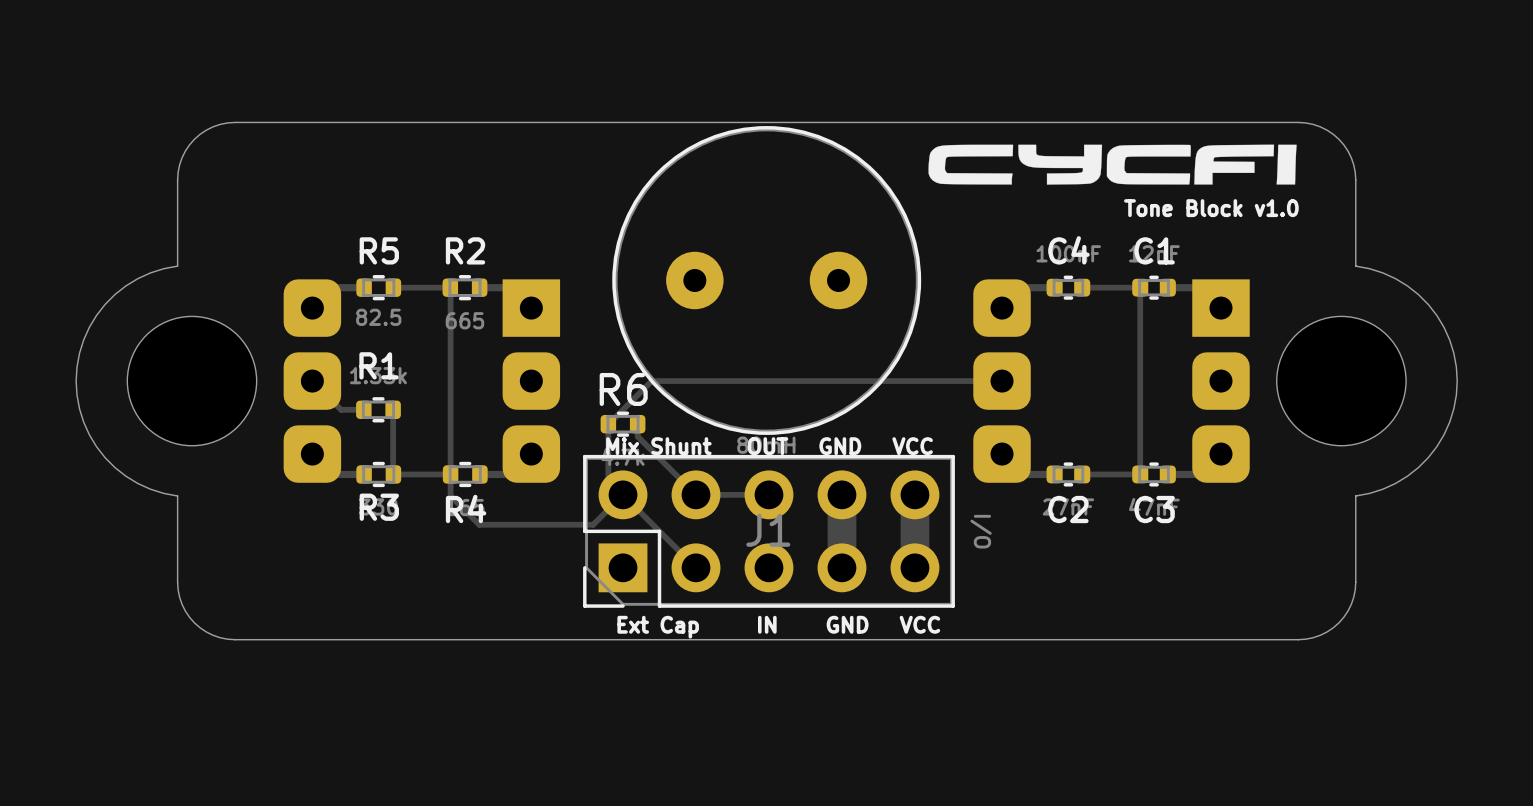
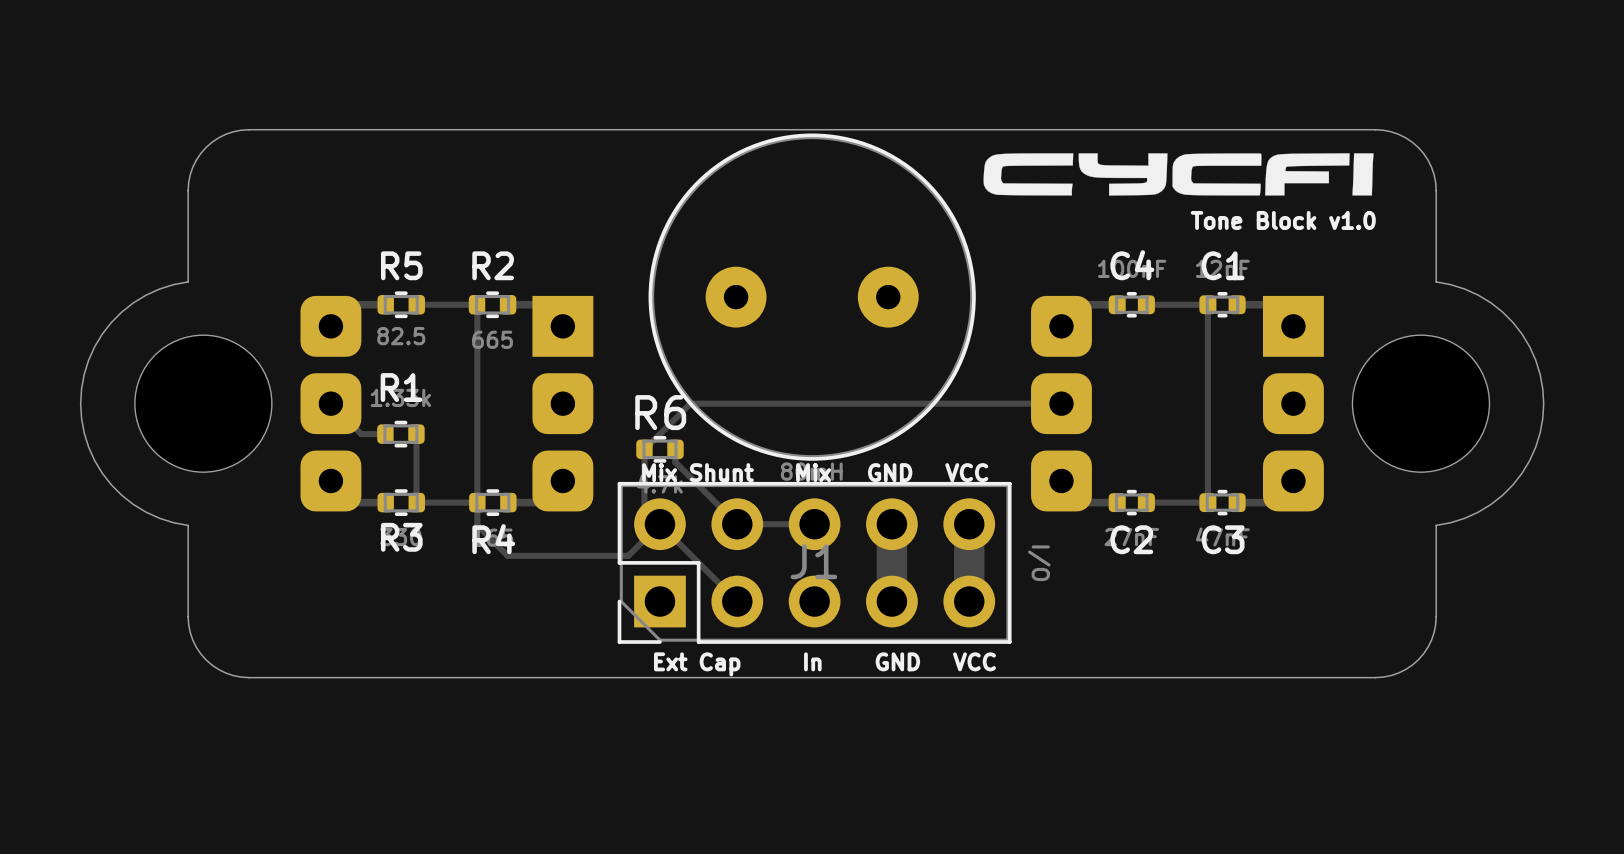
text: OUT (768, 446) -> Mix (813, 472)
text: IN (767, 624) -> In (812, 661)

